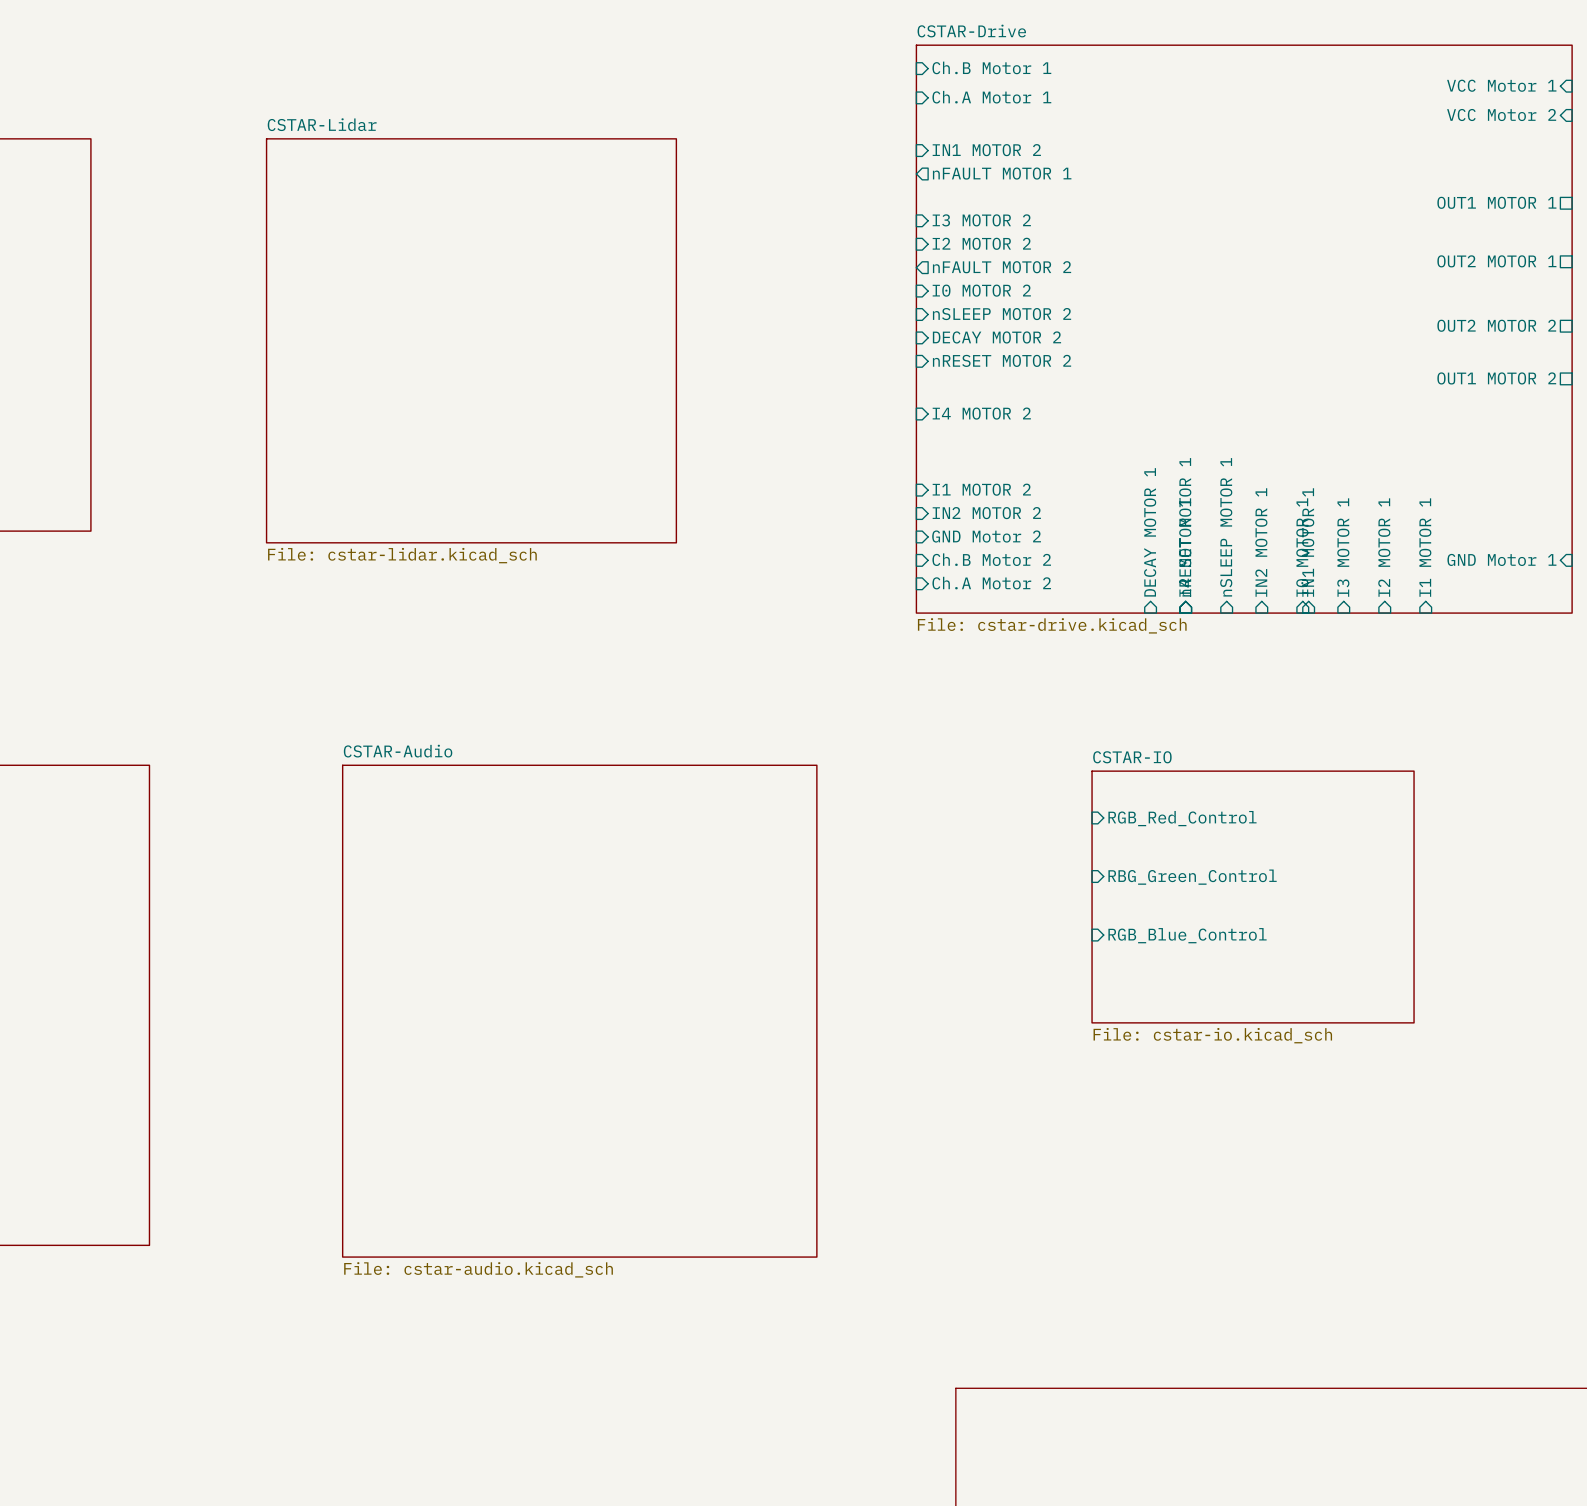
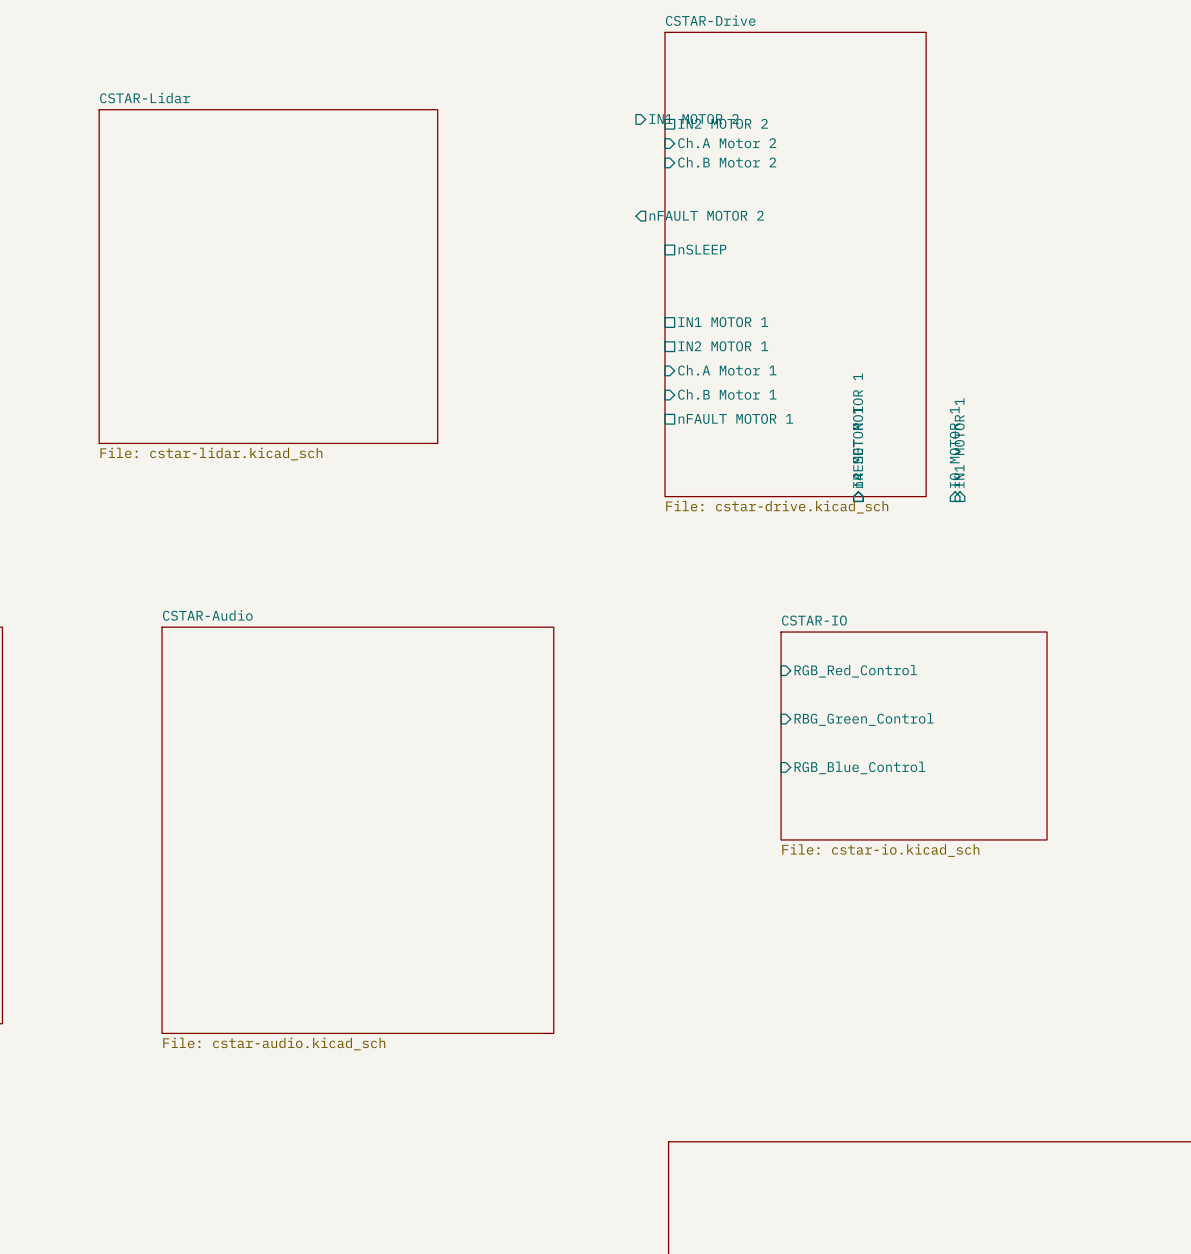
sheet pin: Ch.B Motor 1 (991, 67) -> none
sheet pin: VCC Motor 1 (1501, 85) -> none
sheet pin: Ch.A Motor 1 (991, 97) -> none
sheet pin: VCC Motor 2 (1501, 115) -> none
sheet pin: none -> IN2 MOTOR 2 (723, 123)
sheet pin: nFAULT MOTOR 1 (1002, 173) -> none
sheet pin: none -> Ch.A Motor 2 (727, 143)
sheet pin: none -> Ch.B Motor 2 (727, 162)
sheet pin: OUT1 MOTOR 1 (1496, 202) -> none
sheet pin: I3 MOTOR 2 (981, 220) -> none
sheet pin: I2 MOTOR 2 (981, 243) -> none
sheet pin: OUT2 MOTOR 1 (1496, 261) -> none
sheet pin: I0 MOTOR 2 (981, 290) -> none
sheet pin: none -> nSLEEP (702, 249)
sheet pin: nSLEEP MOTOR 2 (1002, 314) -> none
sheet pin: OUT2 MOTOR 2 (1496, 325) -> none
sheet CSTAR-Drive: none -> File: cstar-drive.kicad_sch (795, 264)
sheet CSTAR-Drive: File: cstar-drive.kicad_sch (1244, 329) -> none
sheet pin: DECAY MOTOR 2 (996, 337) -> none
sheet pin: nRESET MOTOR 2 (1002, 360) -> none
sheet pin: OUT1 MOTOR 2 (1496, 378) -> none
sheet pin: none -> IN1 MOTOR 1 (723, 322)
sheet pin: I4 MOTOR 2 (981, 413) -> none
sheet pin: none -> IN2 MOTOR 1 (723, 346)
sheet pin: none -> Ch.A Motor 1 (727, 370)
sheet pin: none -> Ch.B Motor 1 (727, 394)
sheet pin: I1 MOTOR 2 (981, 489) -> none
sheet pin: IN2 MOTOR 2 (986, 513) -> none
sheet pin: nSLEEP MOTOR 1 (1226, 527) -> none
sheet pin shape: input (1150, 532) -> passive (735, 418)
sheet pin: DECAY MOTOR 1 (1150, 532) -> nFAULT MOTOR 1 (735, 418)
sheet pin: GND Motor 2 (986, 536) -> none
sheet pin: IN2 MOTOR 1 (1261, 542) -> none
sheet pin: I3 MOTOR 1 (1343, 547) -> none
sheet pin: I2 MOTOR 1 (1384, 547) -> none
sheet pin: I1 MOTOR 1 (1425, 547) -> none
sheet pin: Ch.B Motor 2 (991, 559) -> none
sheet pin: GND Motor 1 (1501, 559) -> none
sheet pin: Ch.A Motor 2 (991, 583) -> none

